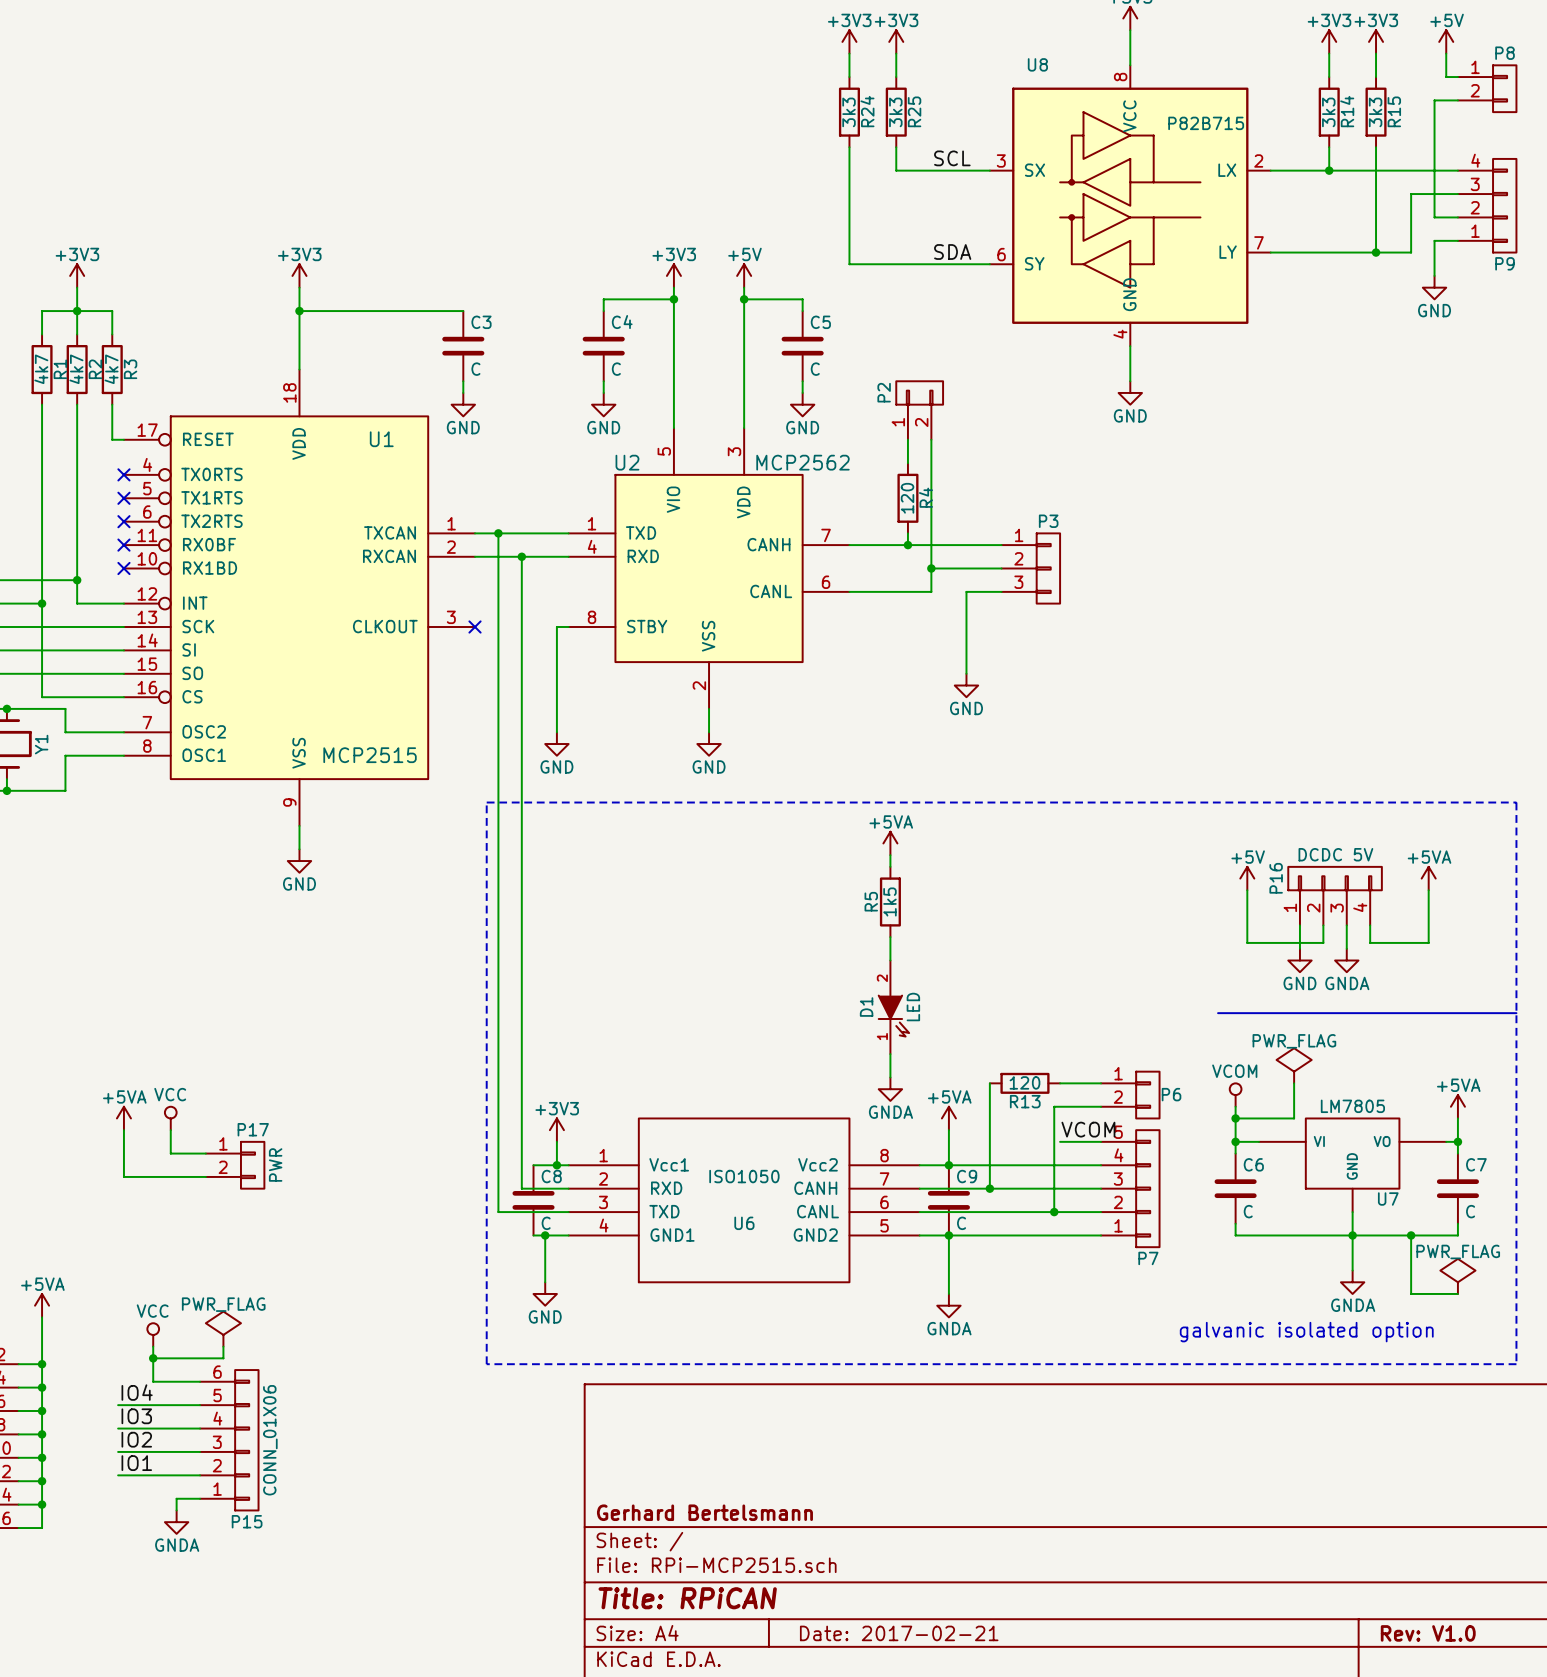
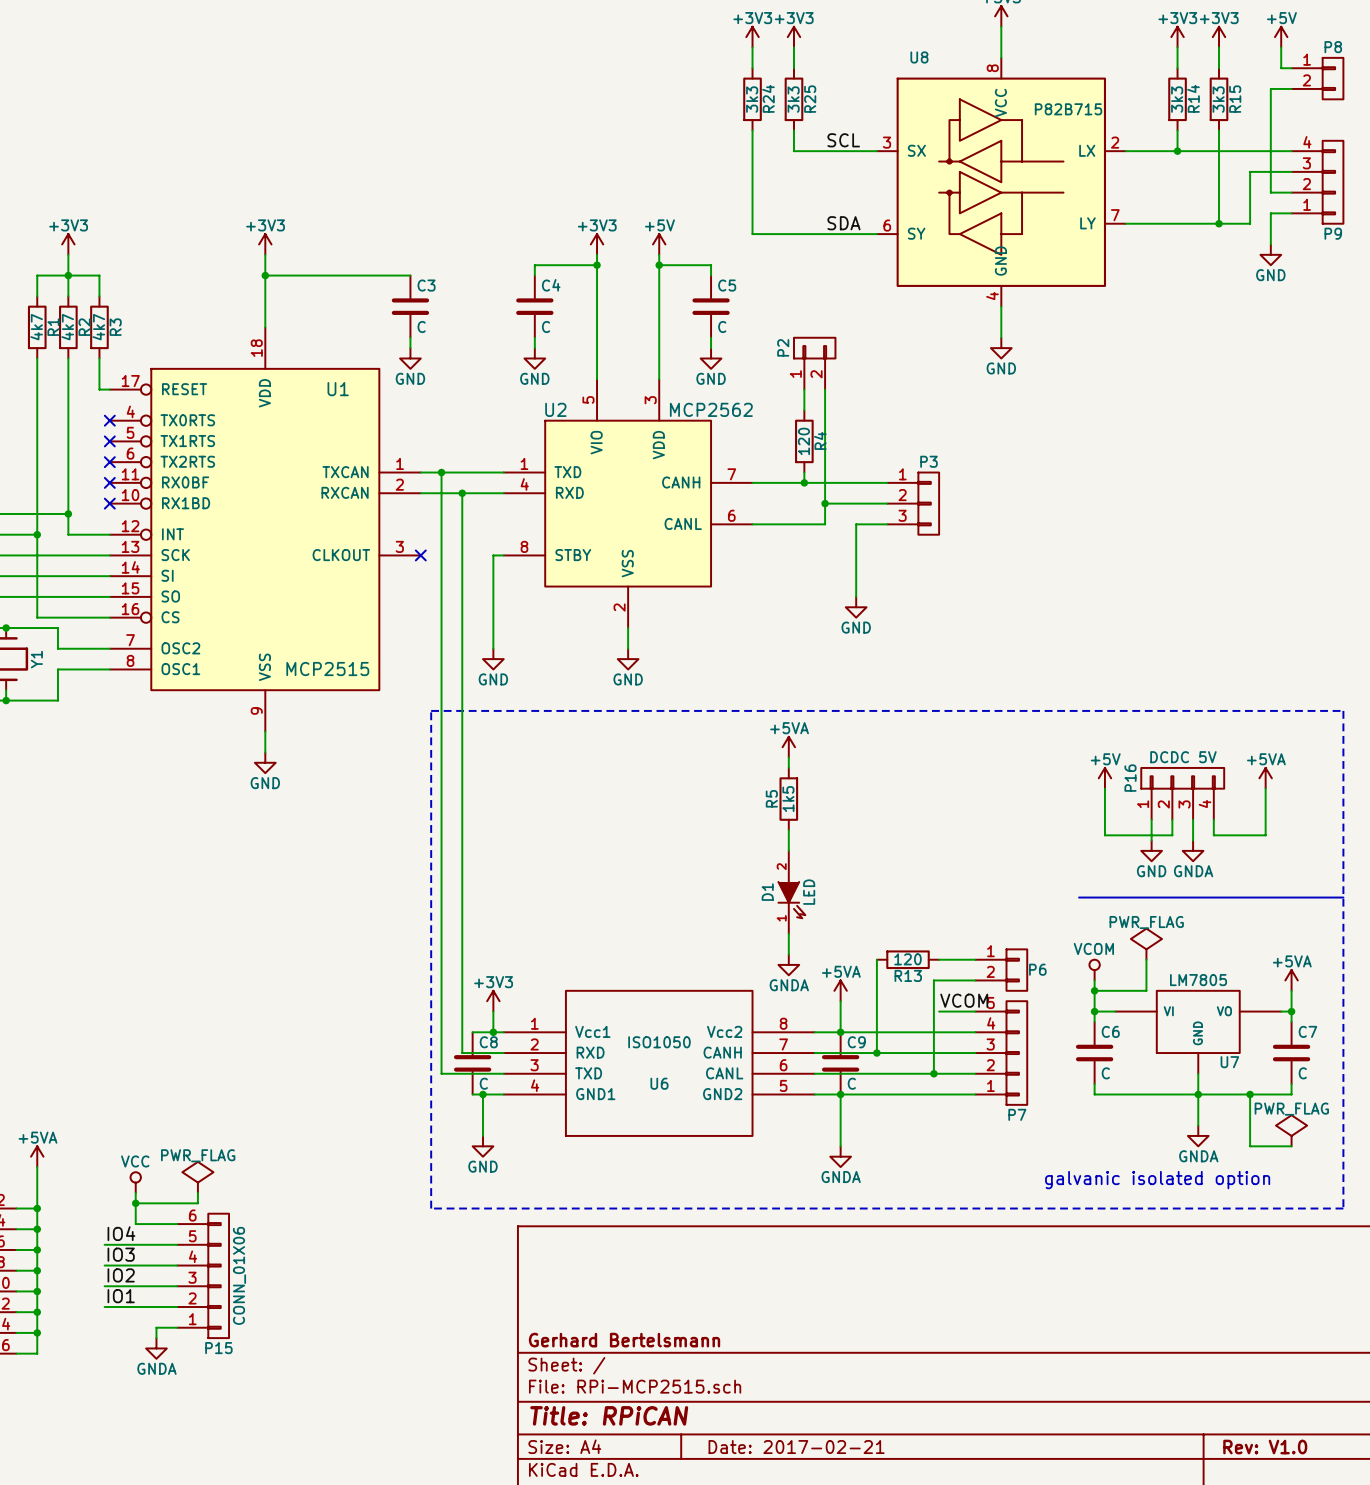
power symbol: +5VA (123, 1118) -> none
power symbol: VCC (170, 1118) -> none
wire: (123, 1130) (123, 1176) (205, 1176) -> none
wire: (170, 1130) (170, 1153) (205, 1153) -> none
P17: PWR (235, 1165) -> none

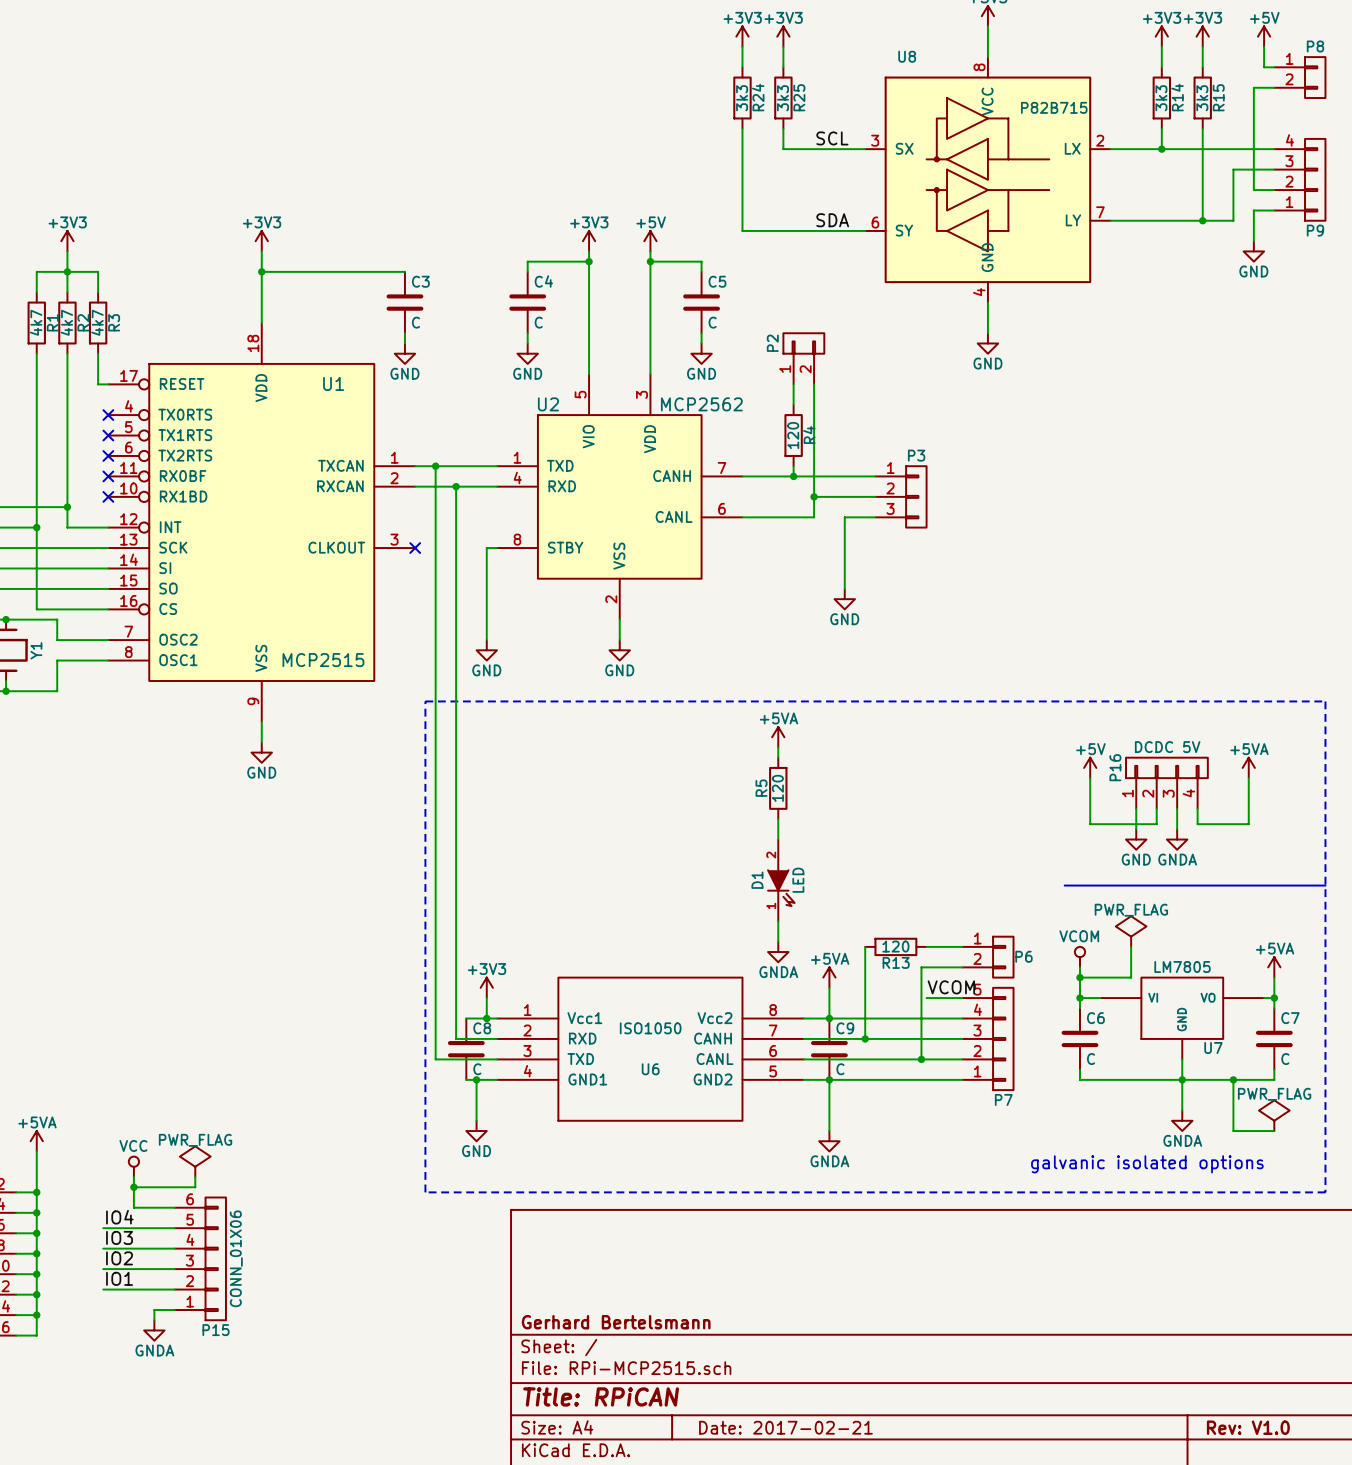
R5 value: 1k5 (788, 799) -> 120 (777, 788)
text: galvanic isolated option (1157, 1180) -> galvanic isolated options (1147, 1164)

